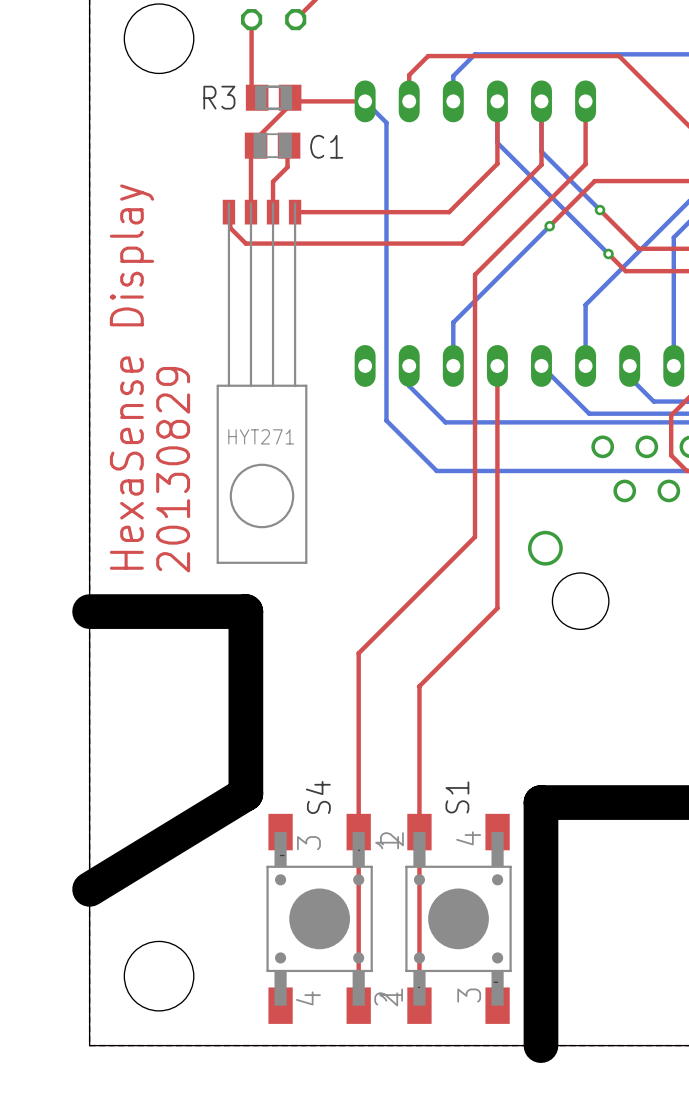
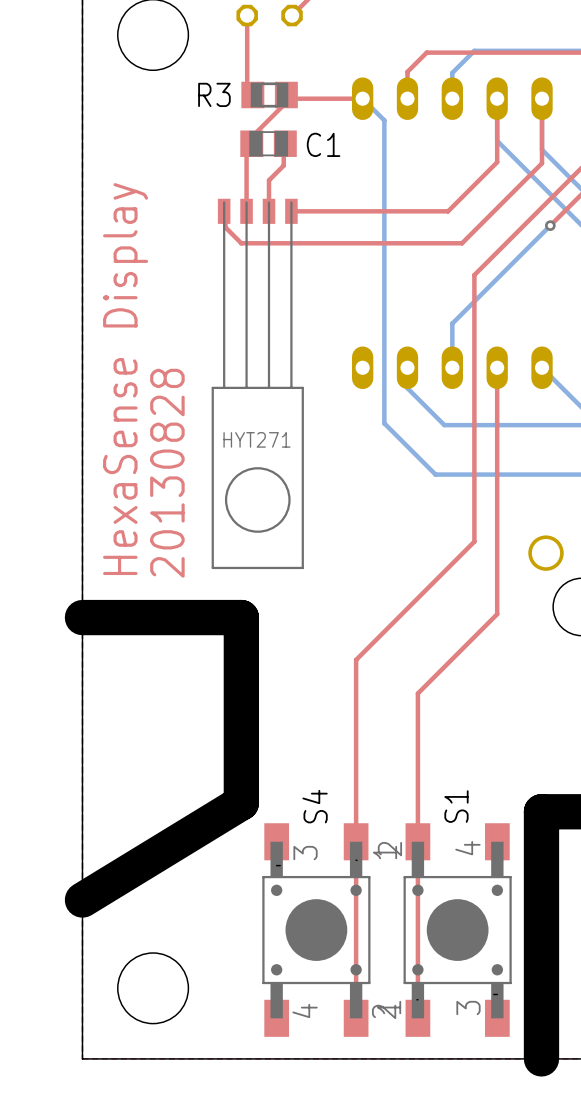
text: 20130829 (173, 469) -> 20130828 (167, 473)

